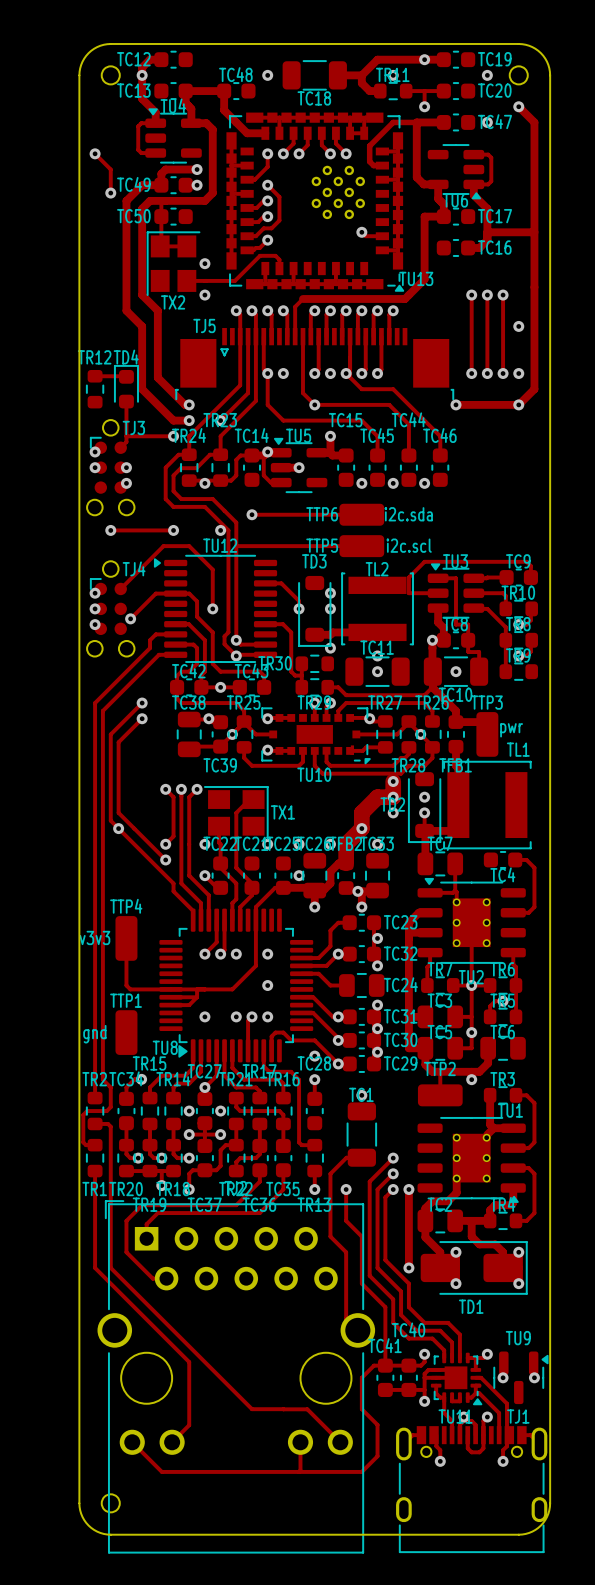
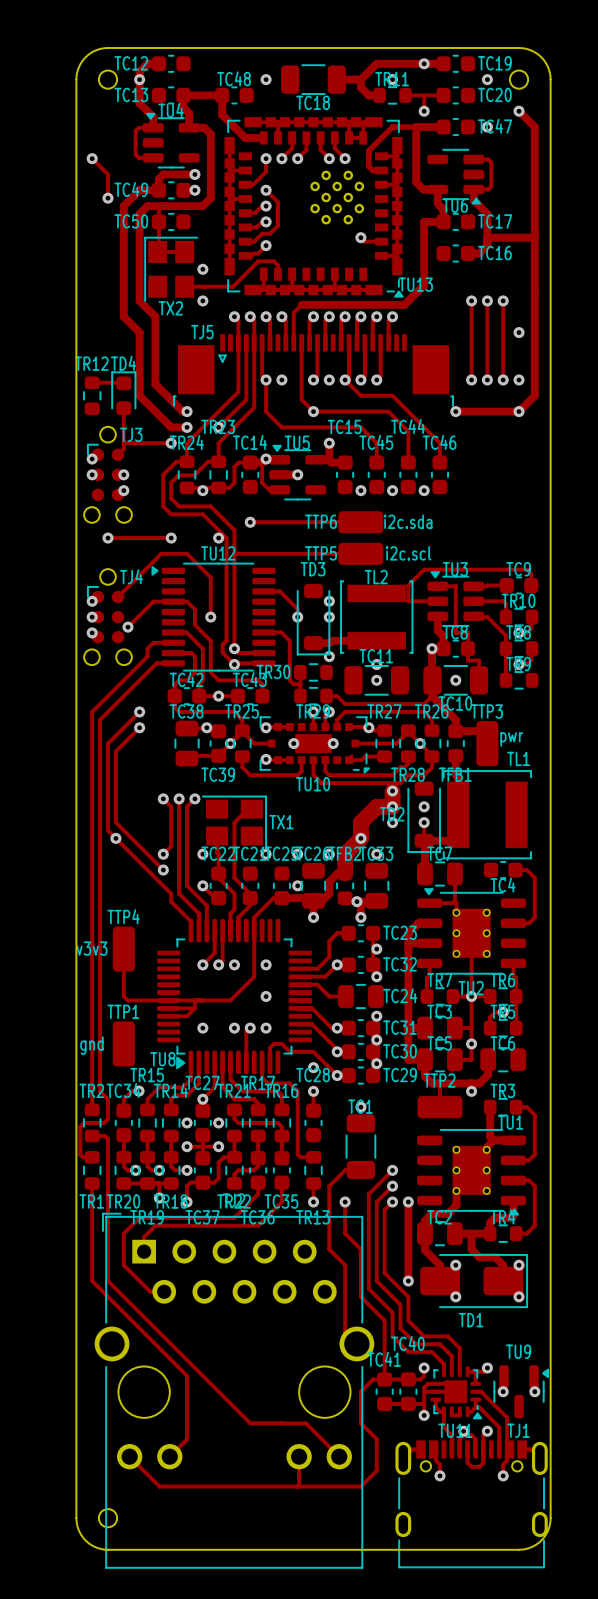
via: none -> (293, 743)
via: none -> (333, 743)

